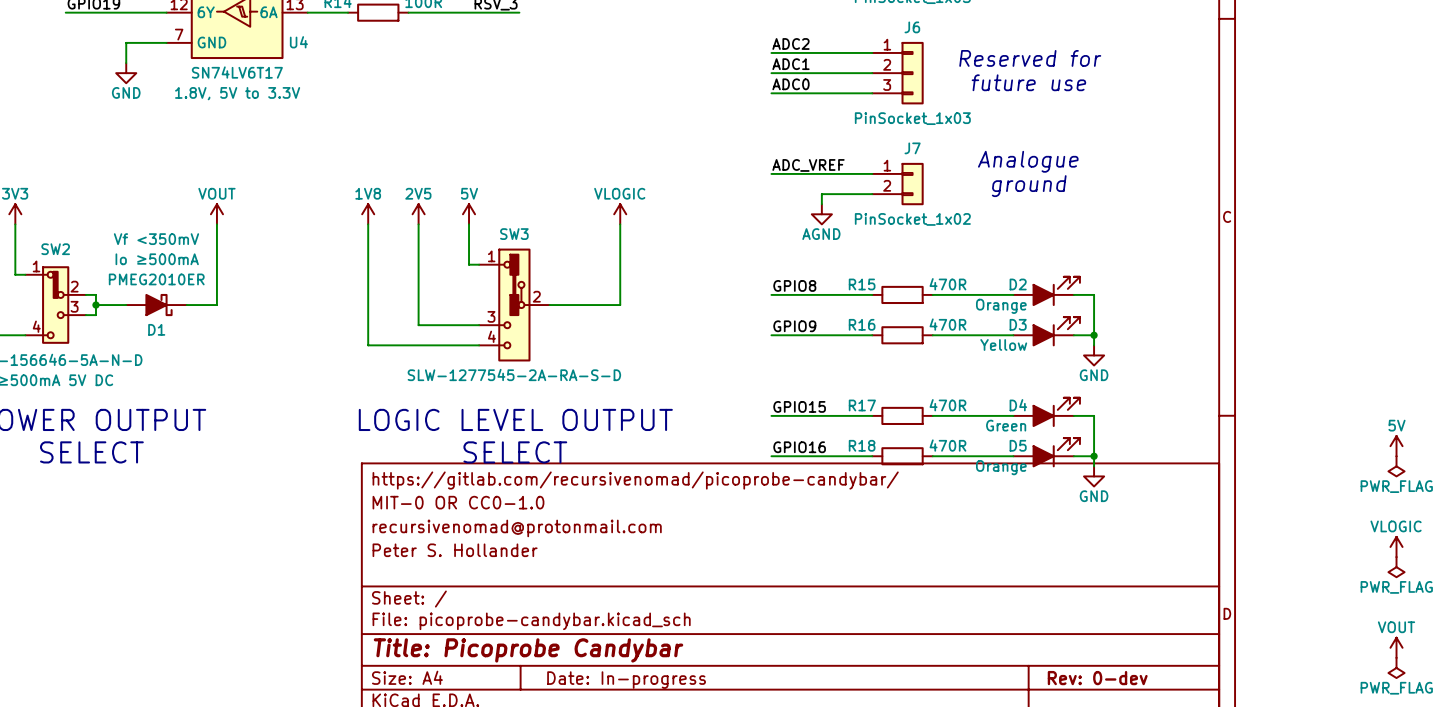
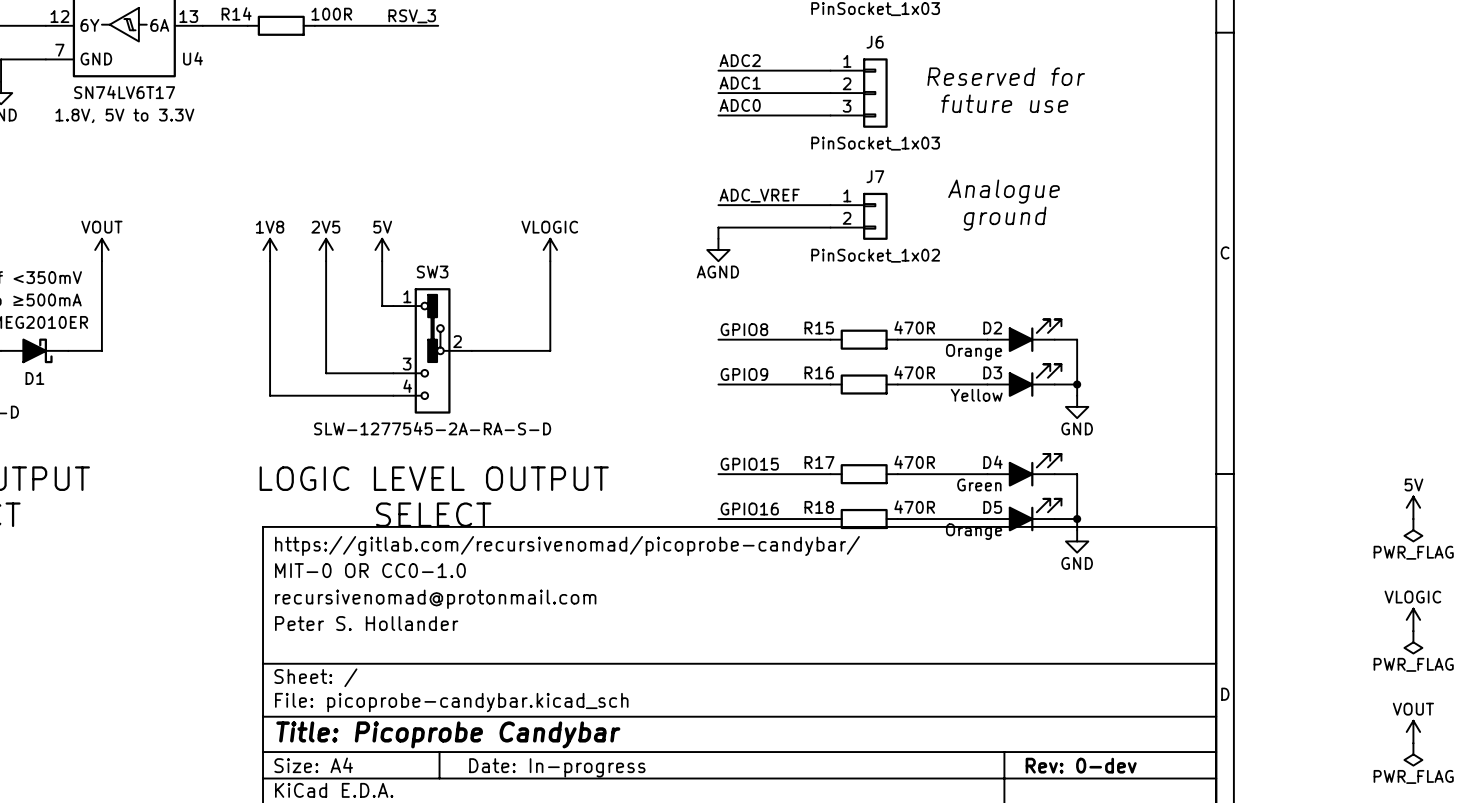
wire: (821, 194) (821, 204) -> (774, 227) (718, 227) (718, 238)
power symbol position: AGND (821, 214) -> AGND (718, 249)

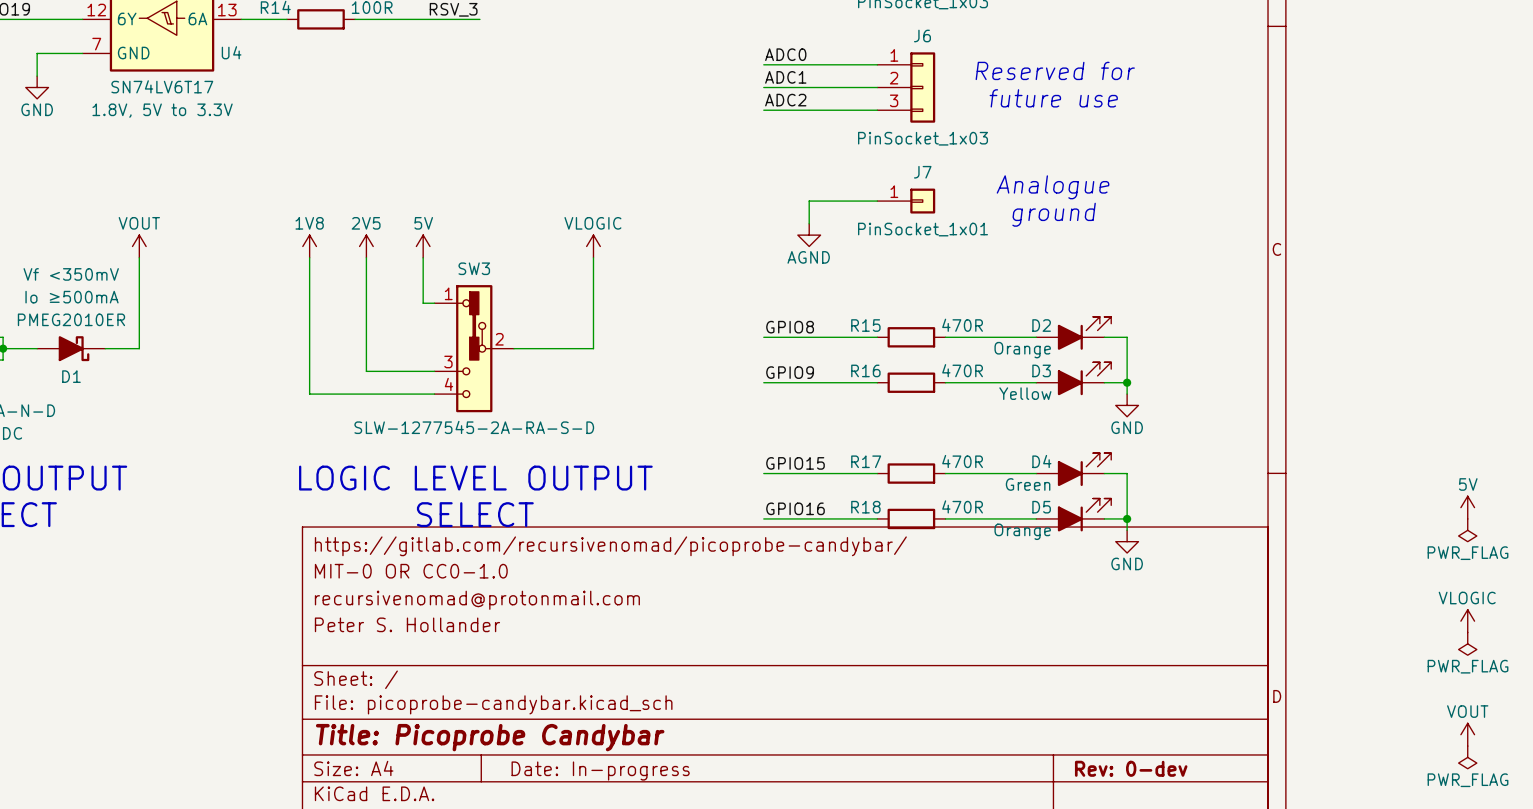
label: ADC2 (740, 60) -> ADC0 (785, 54)
label: ADC0 (740, 105) -> ADC2 (785, 100)
J7 symbol: [830, 192, 888, 240] -> [877, 188, 936, 214]
label: ADC_VREF (759, 195) -> none
wire: (718, 205) (763, 205) -> (809, 223) (809, 201)
wire: (830, 227) (718, 227) (718, 238) -> none
power symbol position: AGND (718, 249) -> AGND (809, 235)
J7 value: PinSocket_1x02 (875, 255) -> PinSocket_1x01 (923, 229)

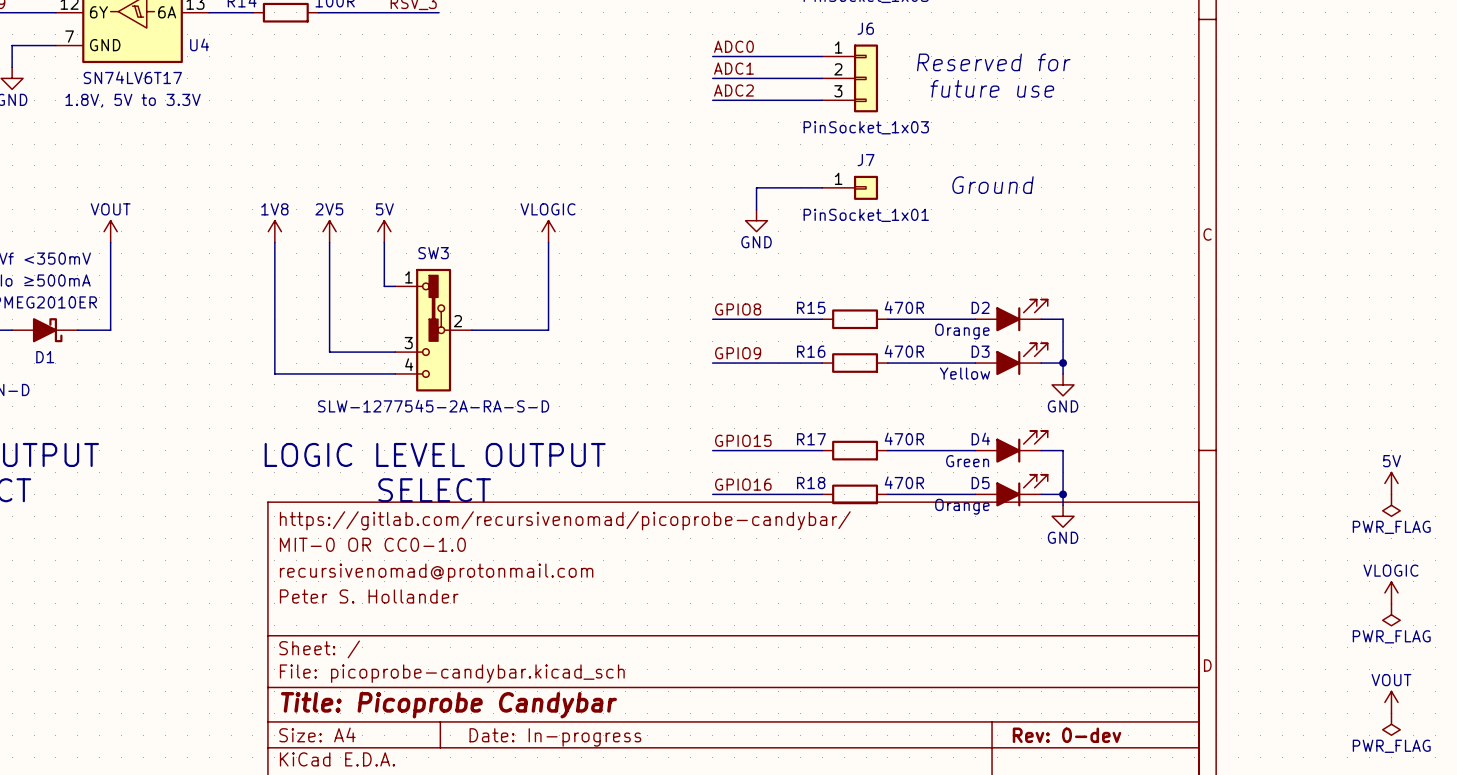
text: Analogue (1053, 187) -> none
text: ground (1054, 214) -> Ground (992, 185)
power symbol: AGND (809, 235) -> GND (756, 220)

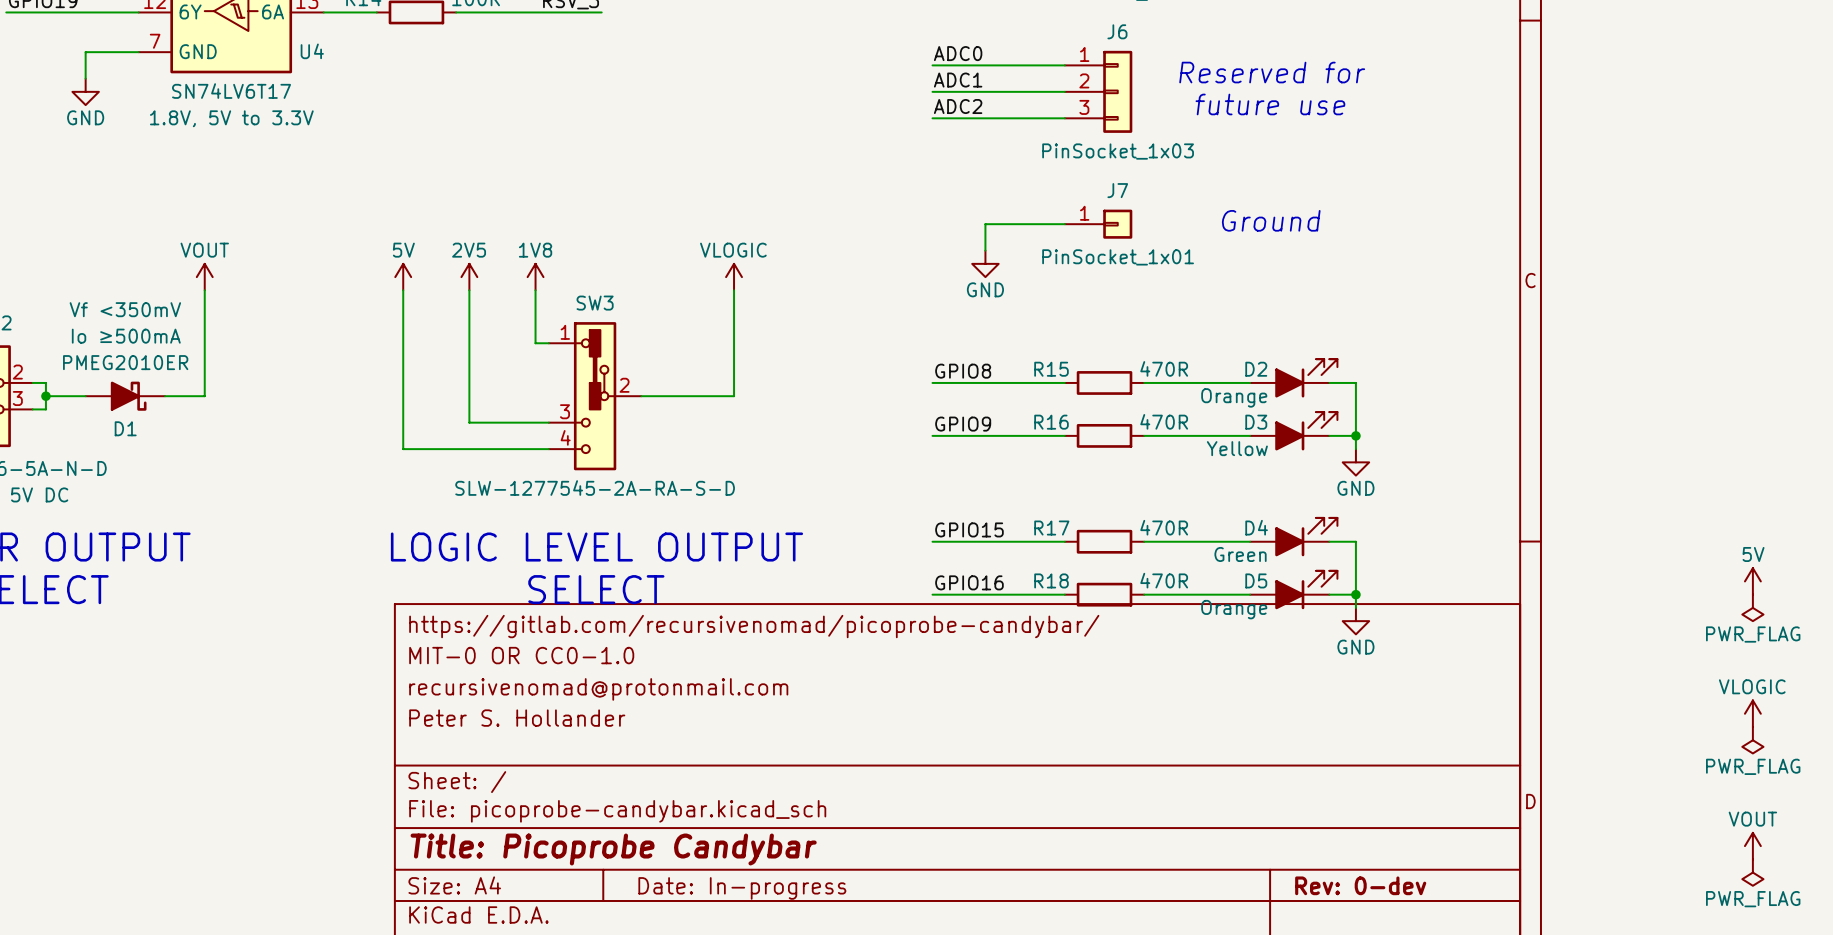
power symbol: 1V8 (274, 231) -> 5V (403, 277)
power symbol: 5V (384, 231) -> 1V8 (535, 277)

